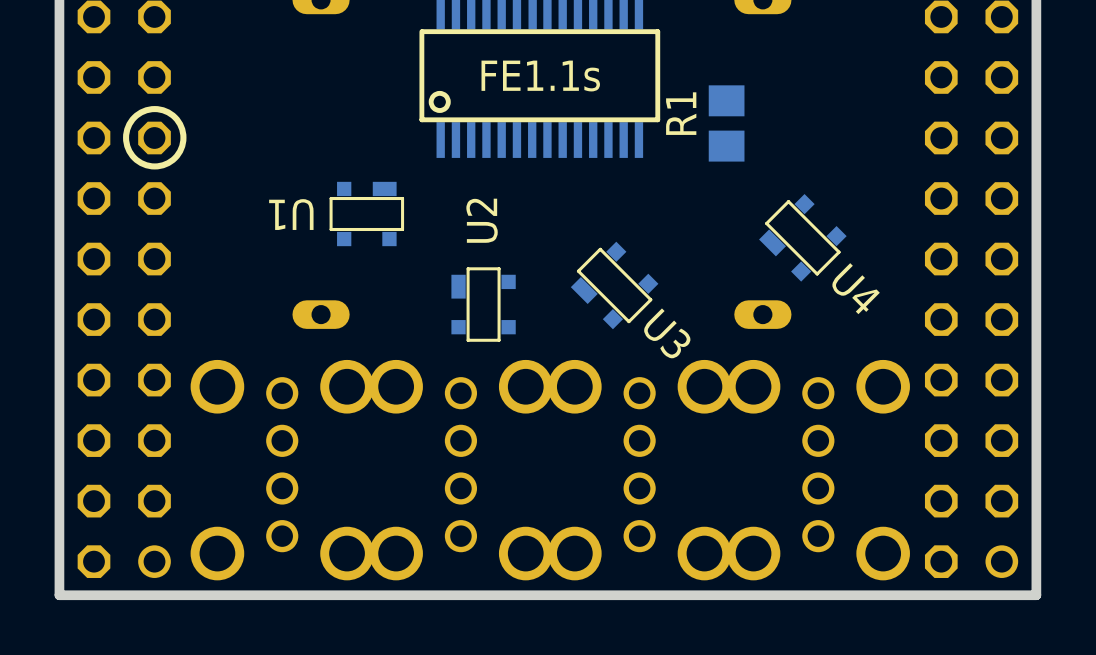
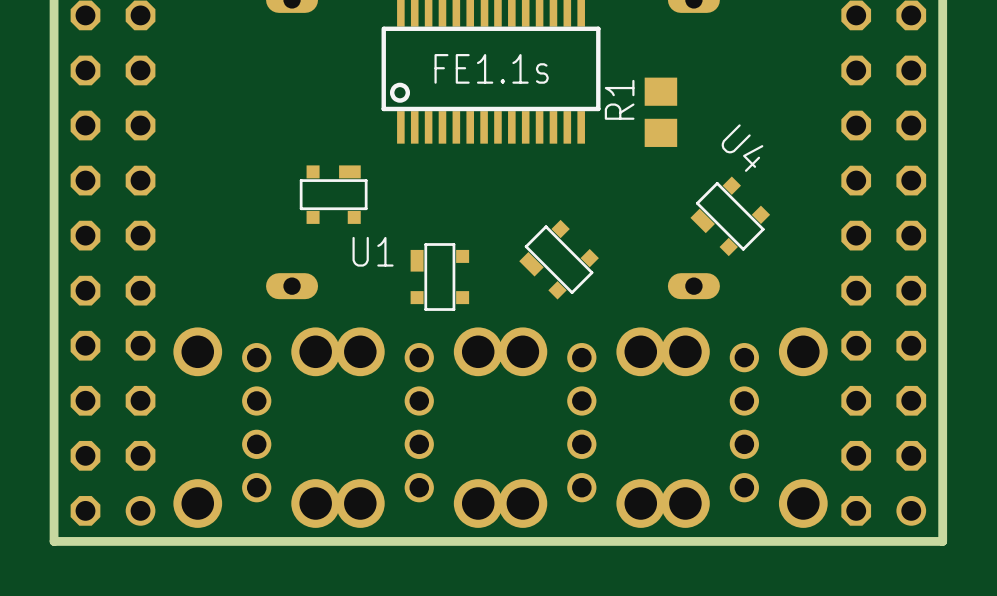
drawing: [123, 106, 187, 170] -> none
U1 name rotation: 0° (291, 214) -> 180° (373, 251)
U1 name position: U1 (291, 214) -> U1 (373, 251)
U2 name: U2 (482, 220) -> none
U4 name position: U4 (855, 288) -> U4 (742, 148)
U3 name: U3 (667, 333) -> none

